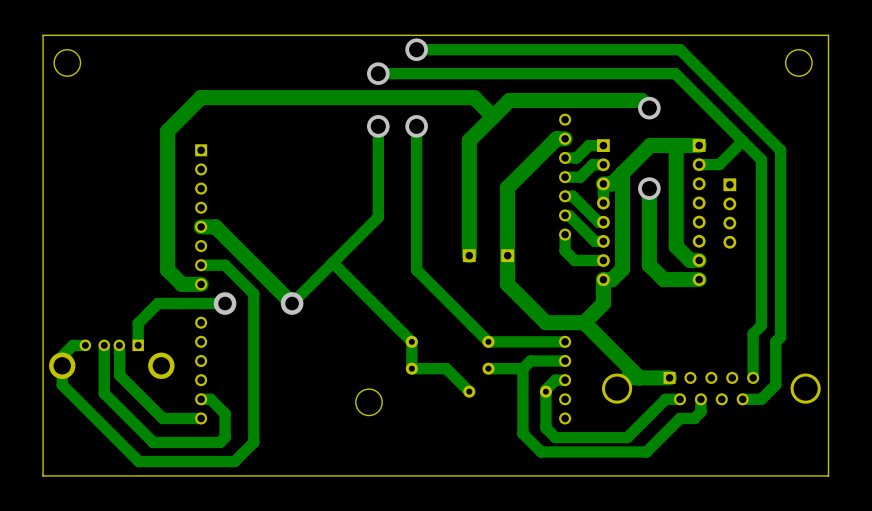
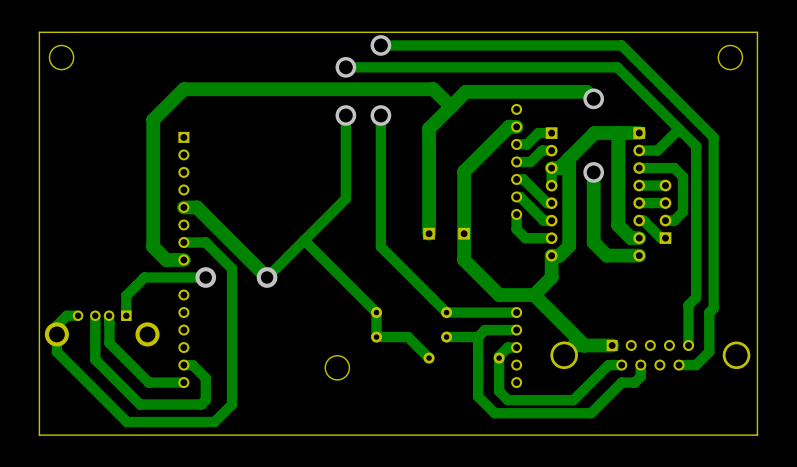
track: none -> (639, 168) (674, 168) (683, 176) (683, 211) (674, 220) (665, 220)
track: none -> (665, 185) (639, 185)
part rotation: 0° (729, 213) -> 180° (665, 211)
track: none -> (665, 203) (639, 203)
track: none -> (639, 220) (643, 220) (661, 238) (665, 238)

